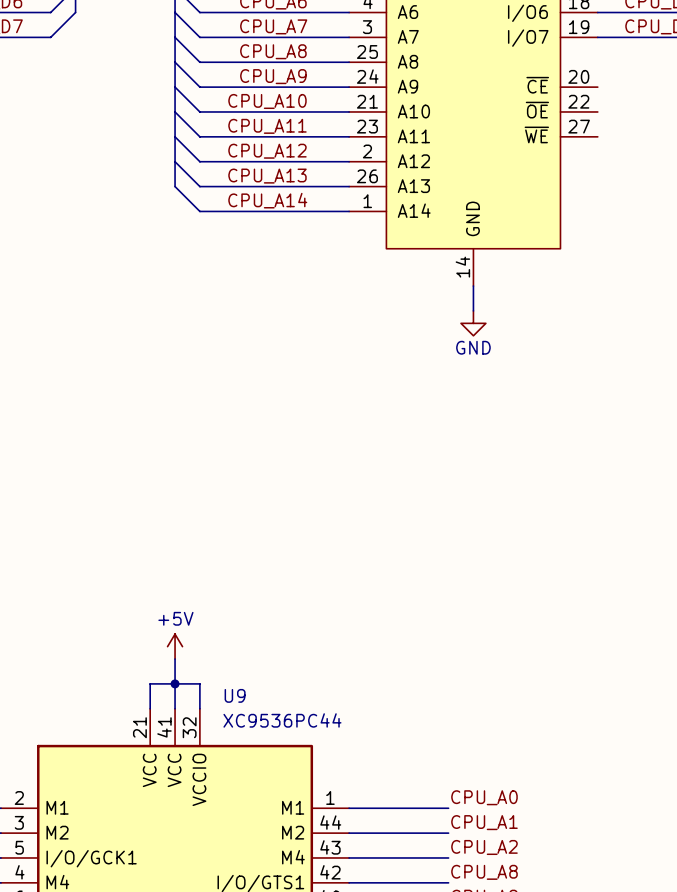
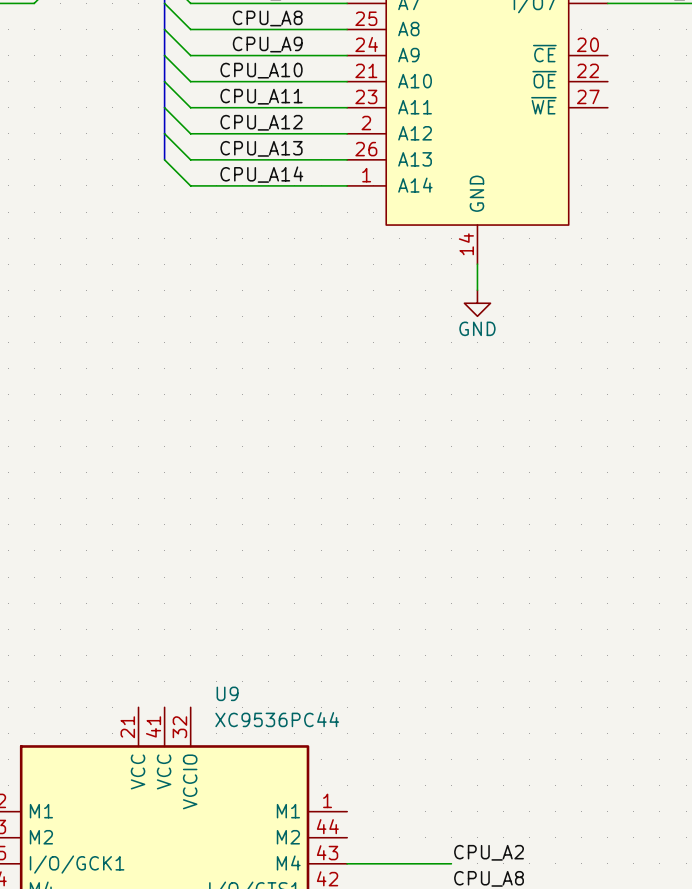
power symbol: +5V (175, 646) -> none
wire: (175, 659) (175, 708) -> none
junction: (175, 683) -> none
wire: (150, 708) (150, 683) (199, 683) (199, 708) -> none
label: CPU_A0 (484, 797) -> none
wire: (349, 808) (448, 808) -> none
label: CPU_A1 (484, 822) -> none
wire: (349, 833) (448, 833) -> none

